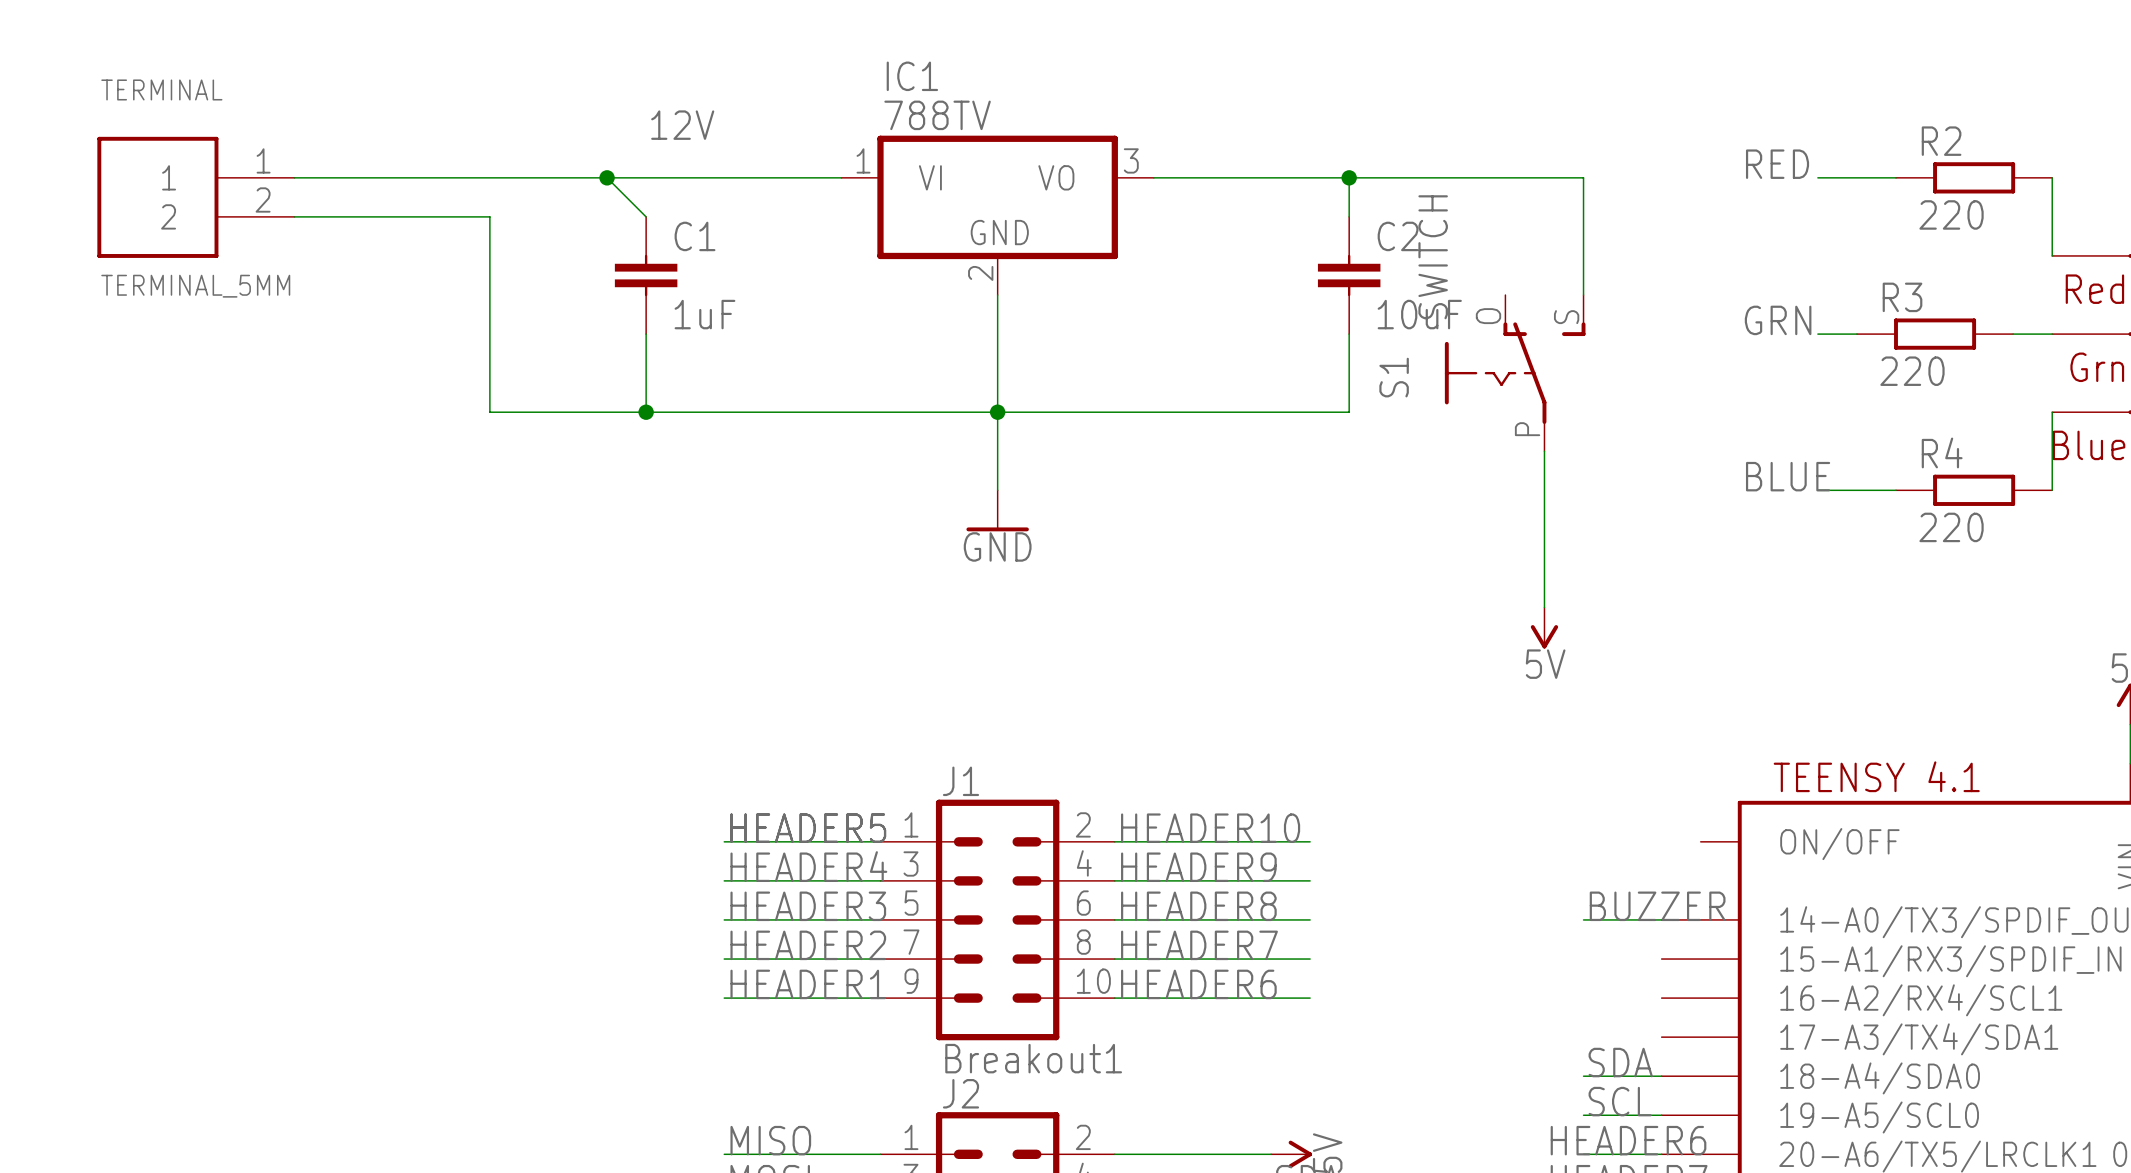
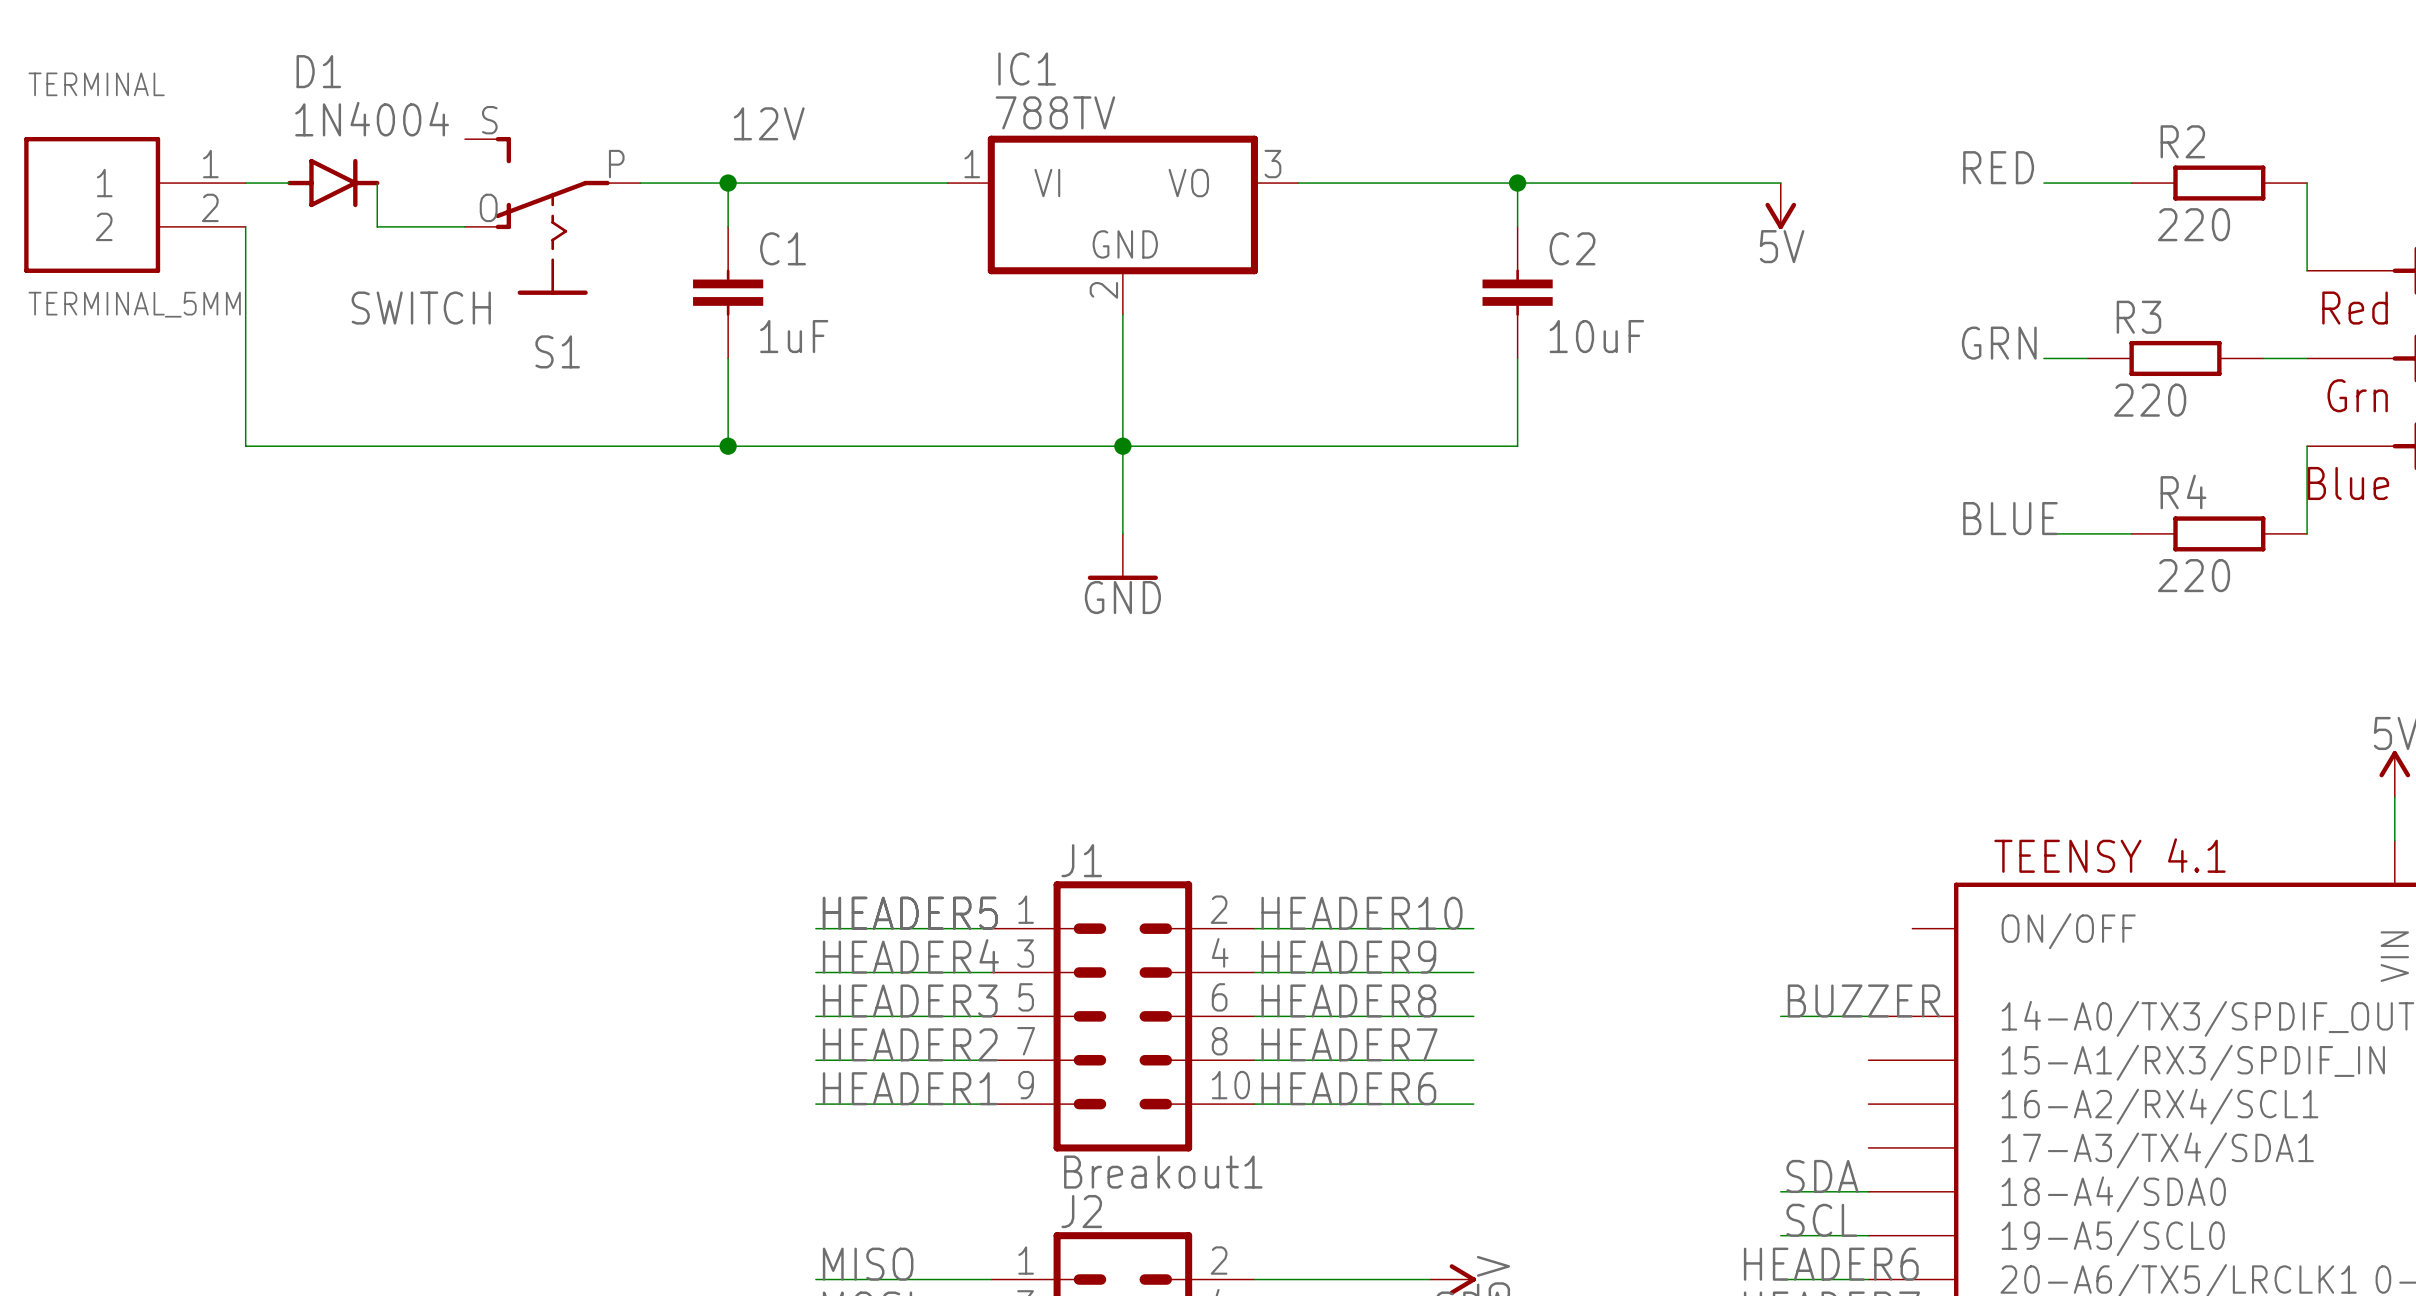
wire: (294, 177) (568, 177) -> none
D1: none -> 1N4004 (333, 183)
wire: (607, 177) (646, 216) -> (728, 183) (728, 226)
junction position: (607, 177) -> (728, 183)
wire: (1583, 177) (1583, 295) -> none
TERMINAL position: (195, 197) -> (134, 204)
power symbol: none -> 5V (1780, 206)
wire: (294, 216) (333, 216) -> (377, 183) (377, 226)
wire: (411, 216) (489, 216) (489, 412) -> (245, 226) (245, 446) (552, 446)
S1 rotation: 0° (1515, 373) -> 90° counterclockwise (552, 215)
S1 position: (1515, 373) -> (552, 215)
wire: (1544, 451) (1544, 607) -> none
power symbol: 5V (1544, 628) -> none

